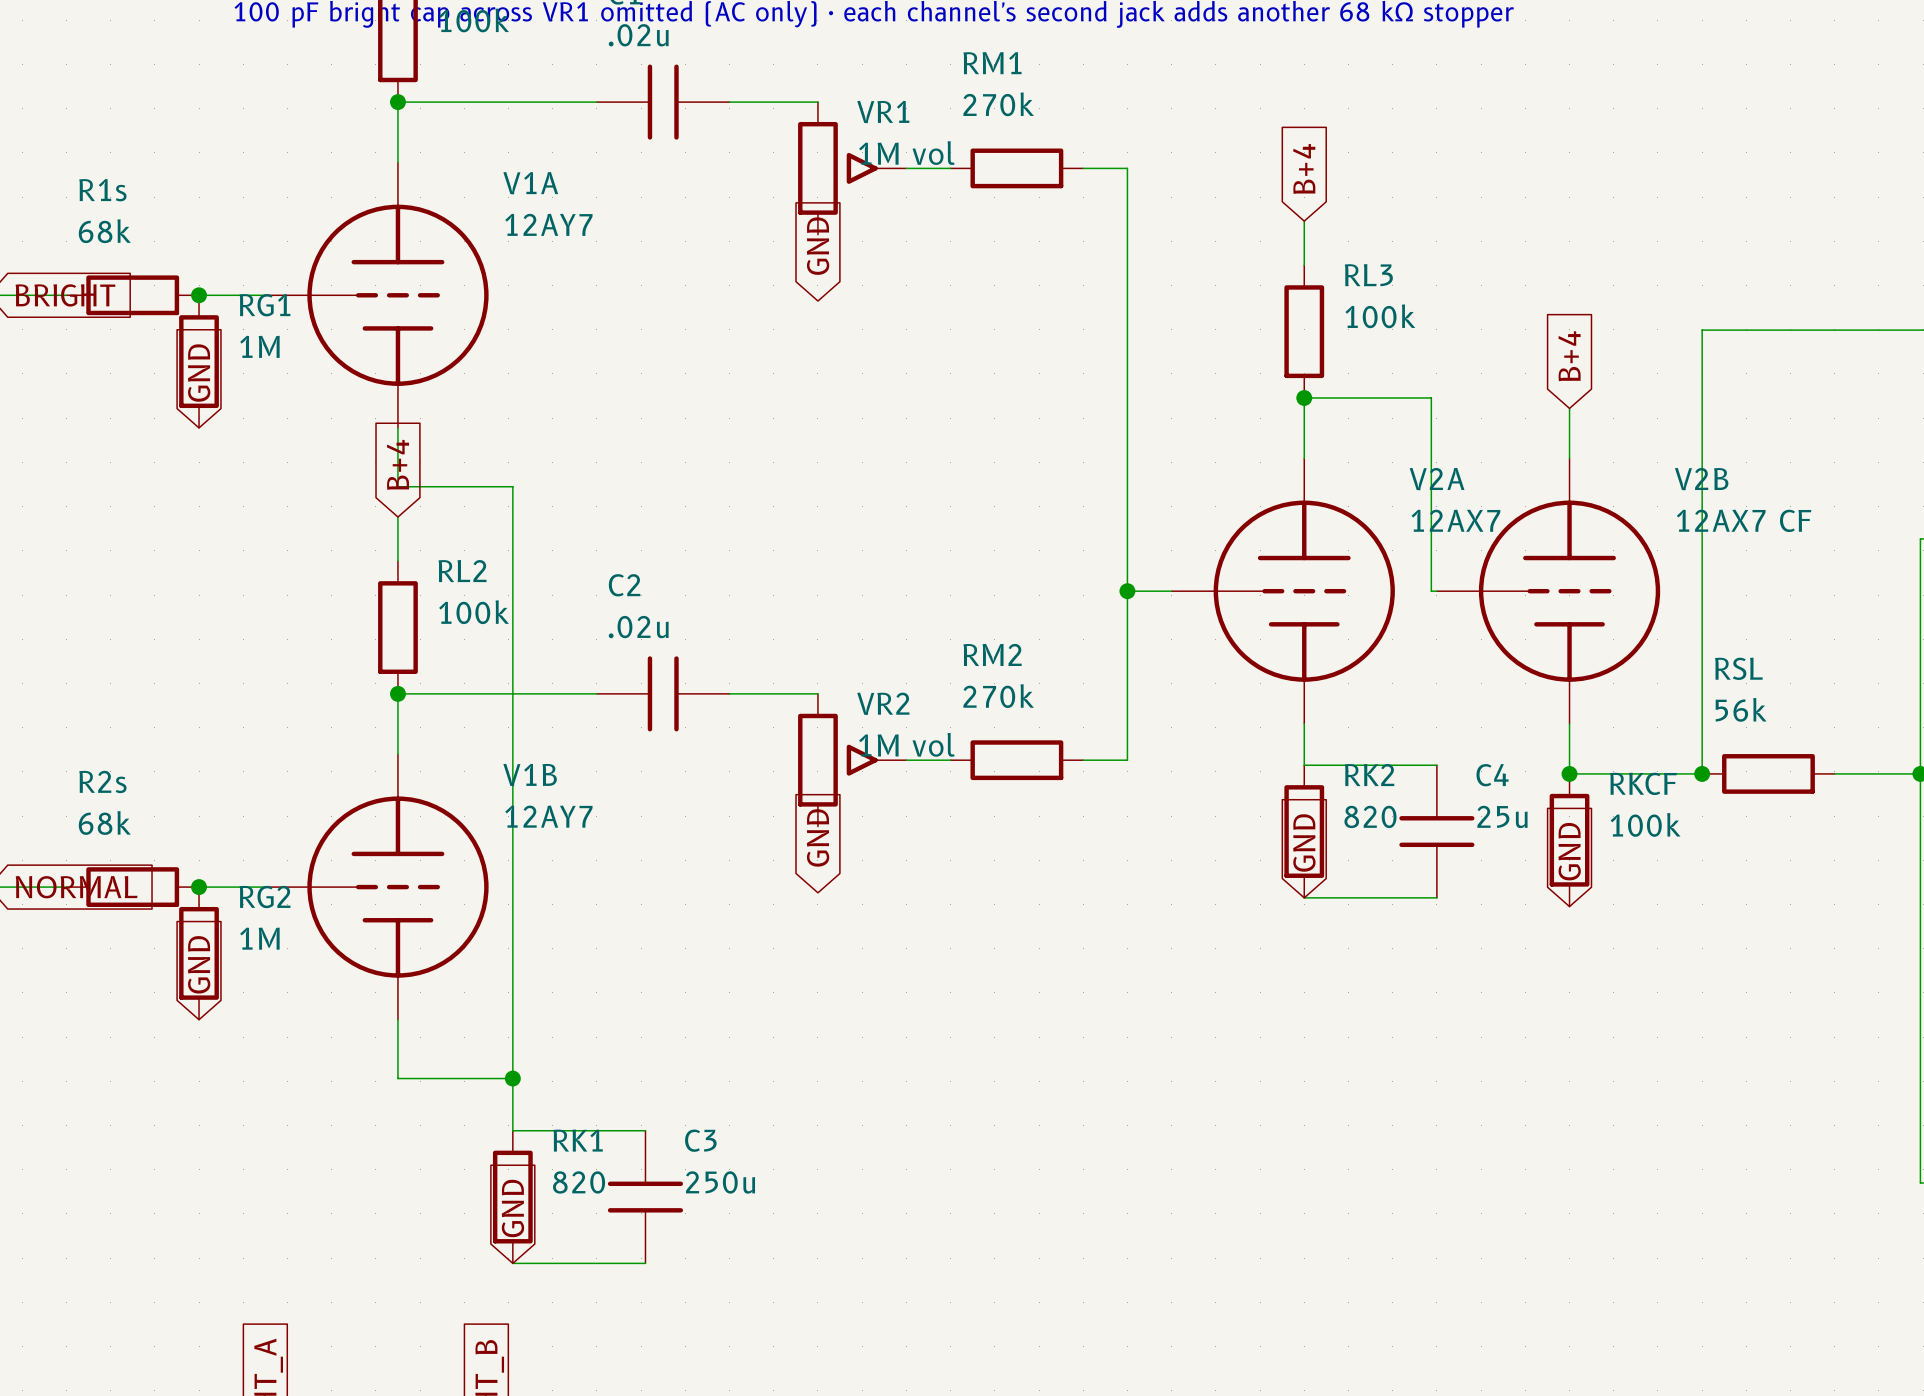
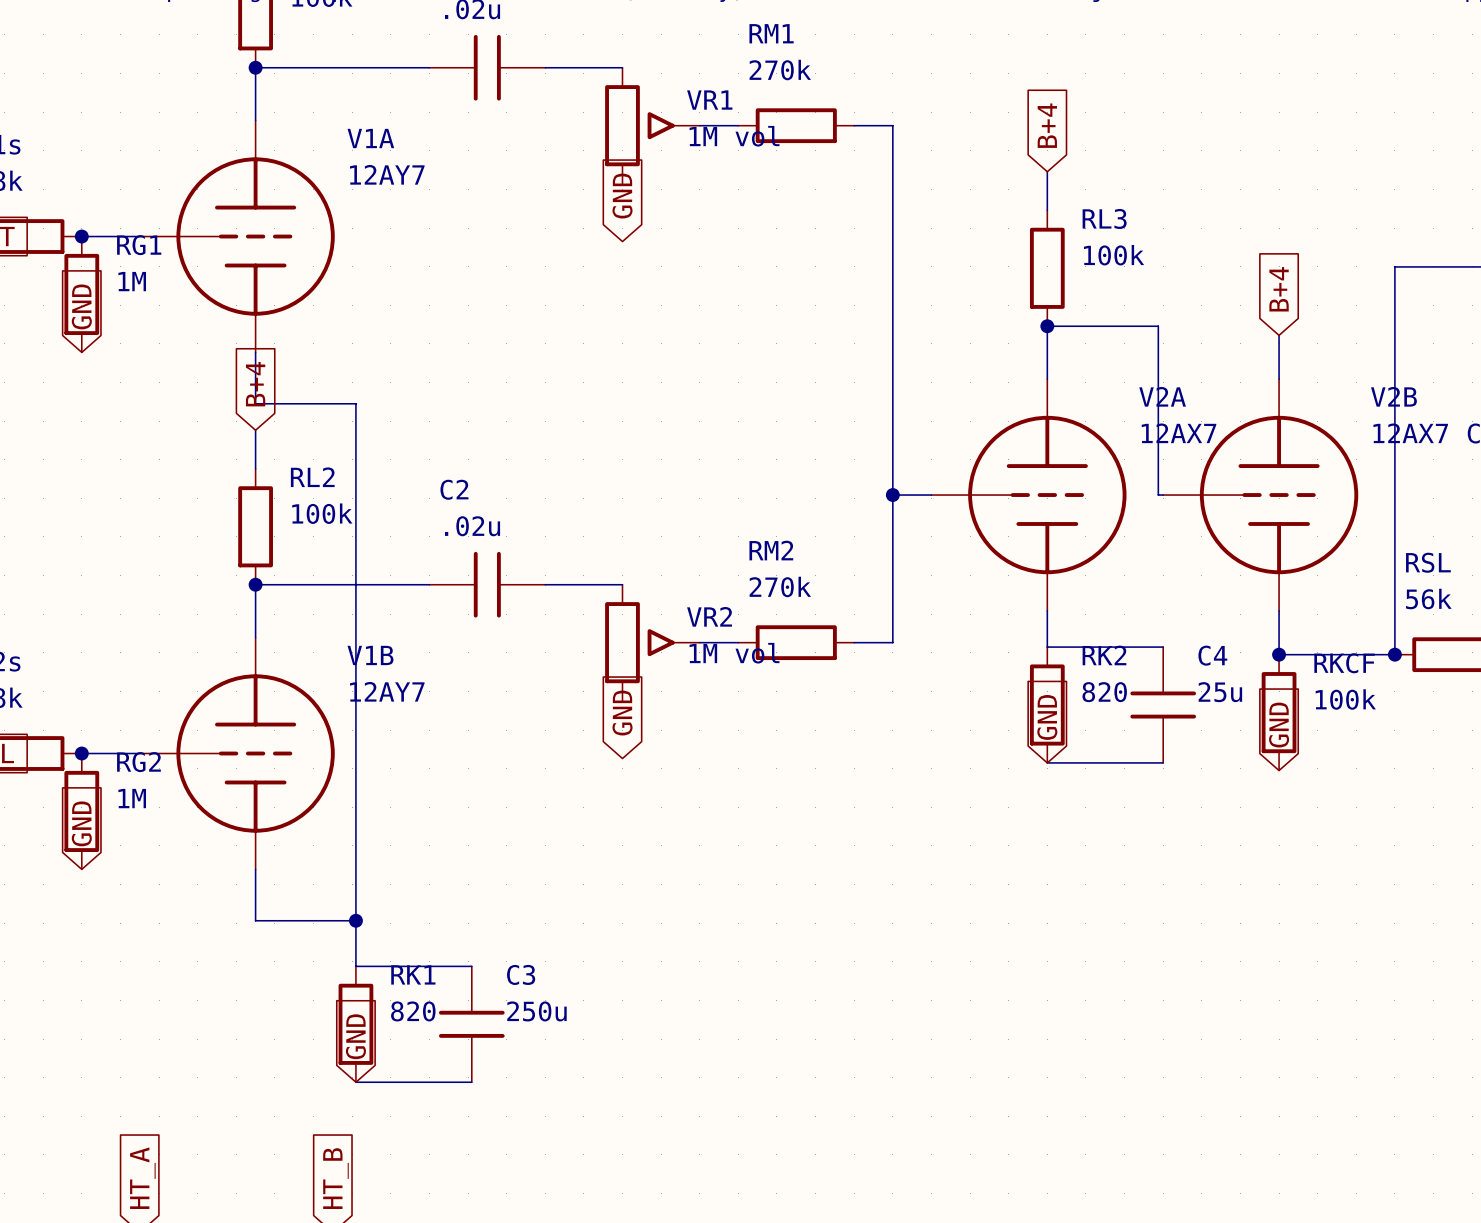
VR1 name position: VR1 (883, 112) -> VR1 (709, 100)
VR1 value position: 1M vol (906, 153) -> 1M vol (734, 136)
VR2 name position: VR2 (883, 703) -> VR2 (709, 616)
VR2 value position: 1M vol (906, 744) -> 1M vol (734, 653)

